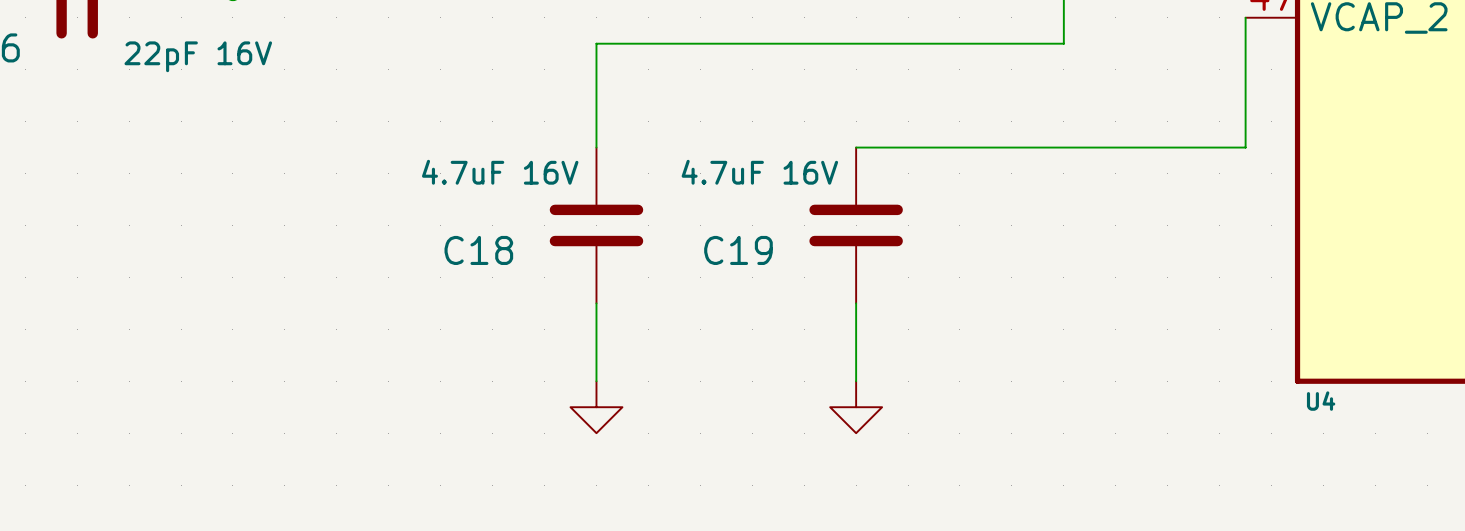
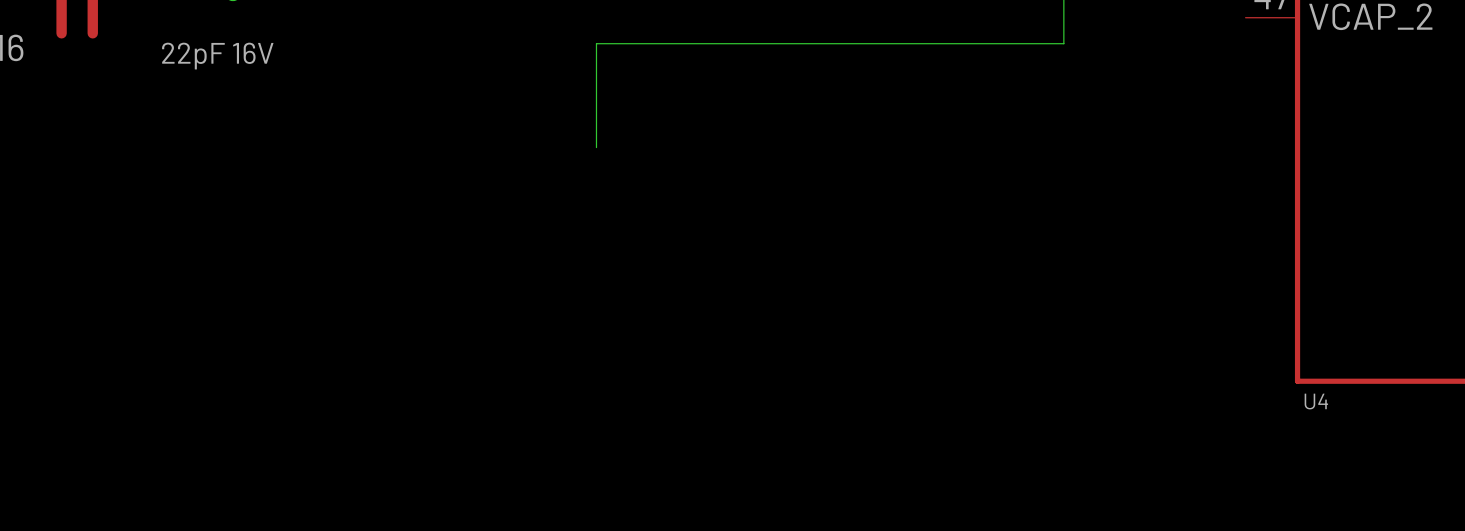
wire: (1245, 17) (1245, 147) (856, 147) -> none
C18: 4.7uF 16V (596, 225) -> none
C19: 4.7uF 16V (856, 225) -> none
wire: (596, 303) (596, 381) -> none
wire: (856, 303) (856, 381) -> none
power symbol: (596, 407) -> none
power symbol: (856, 407) -> none

